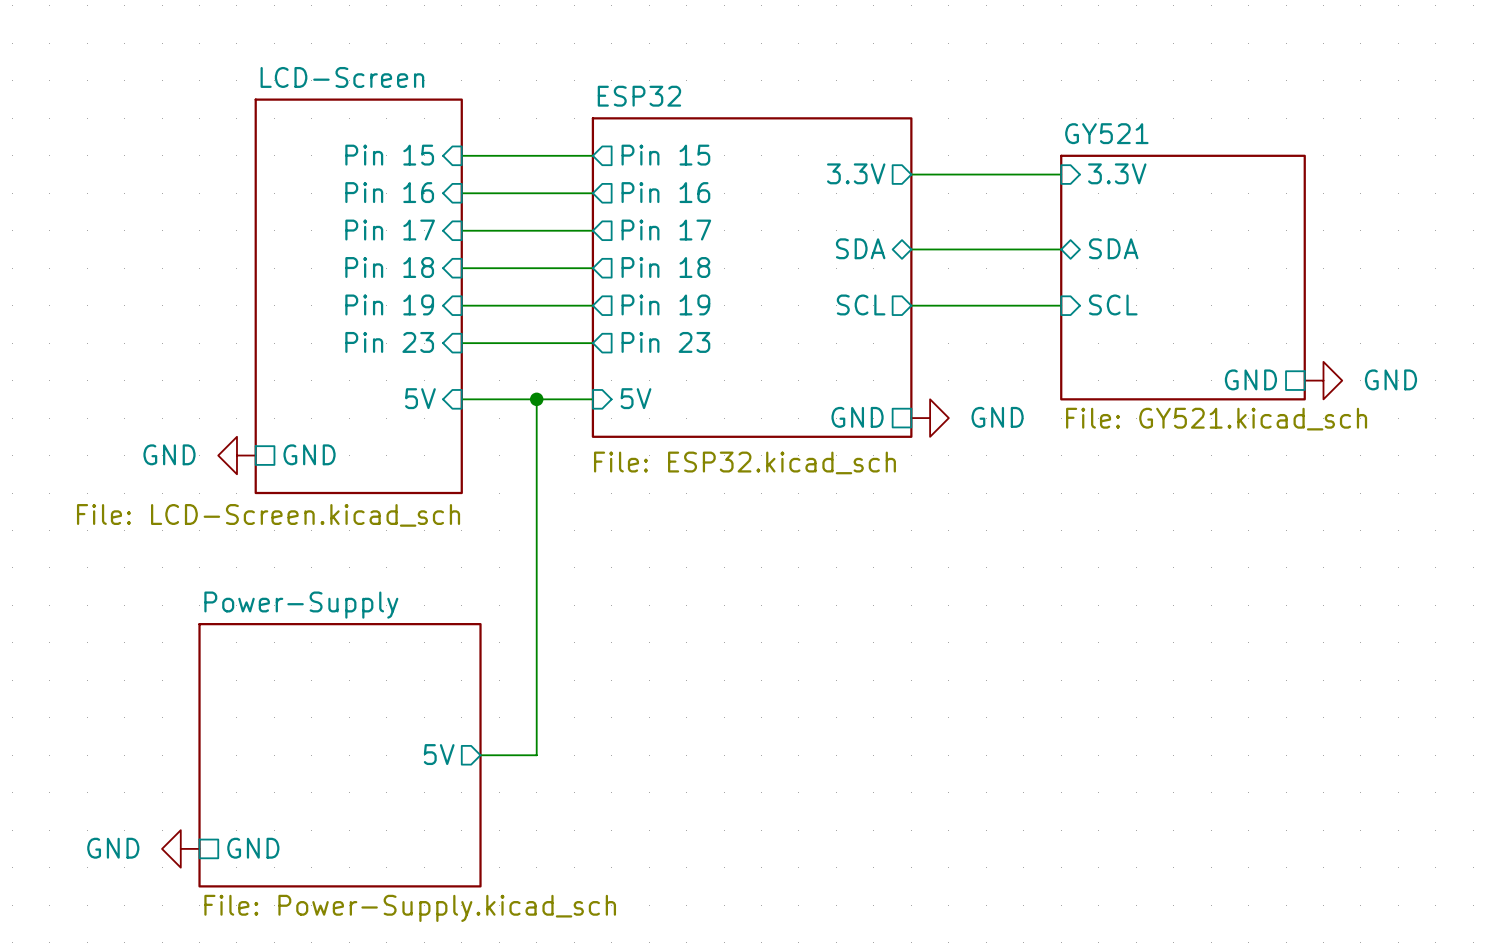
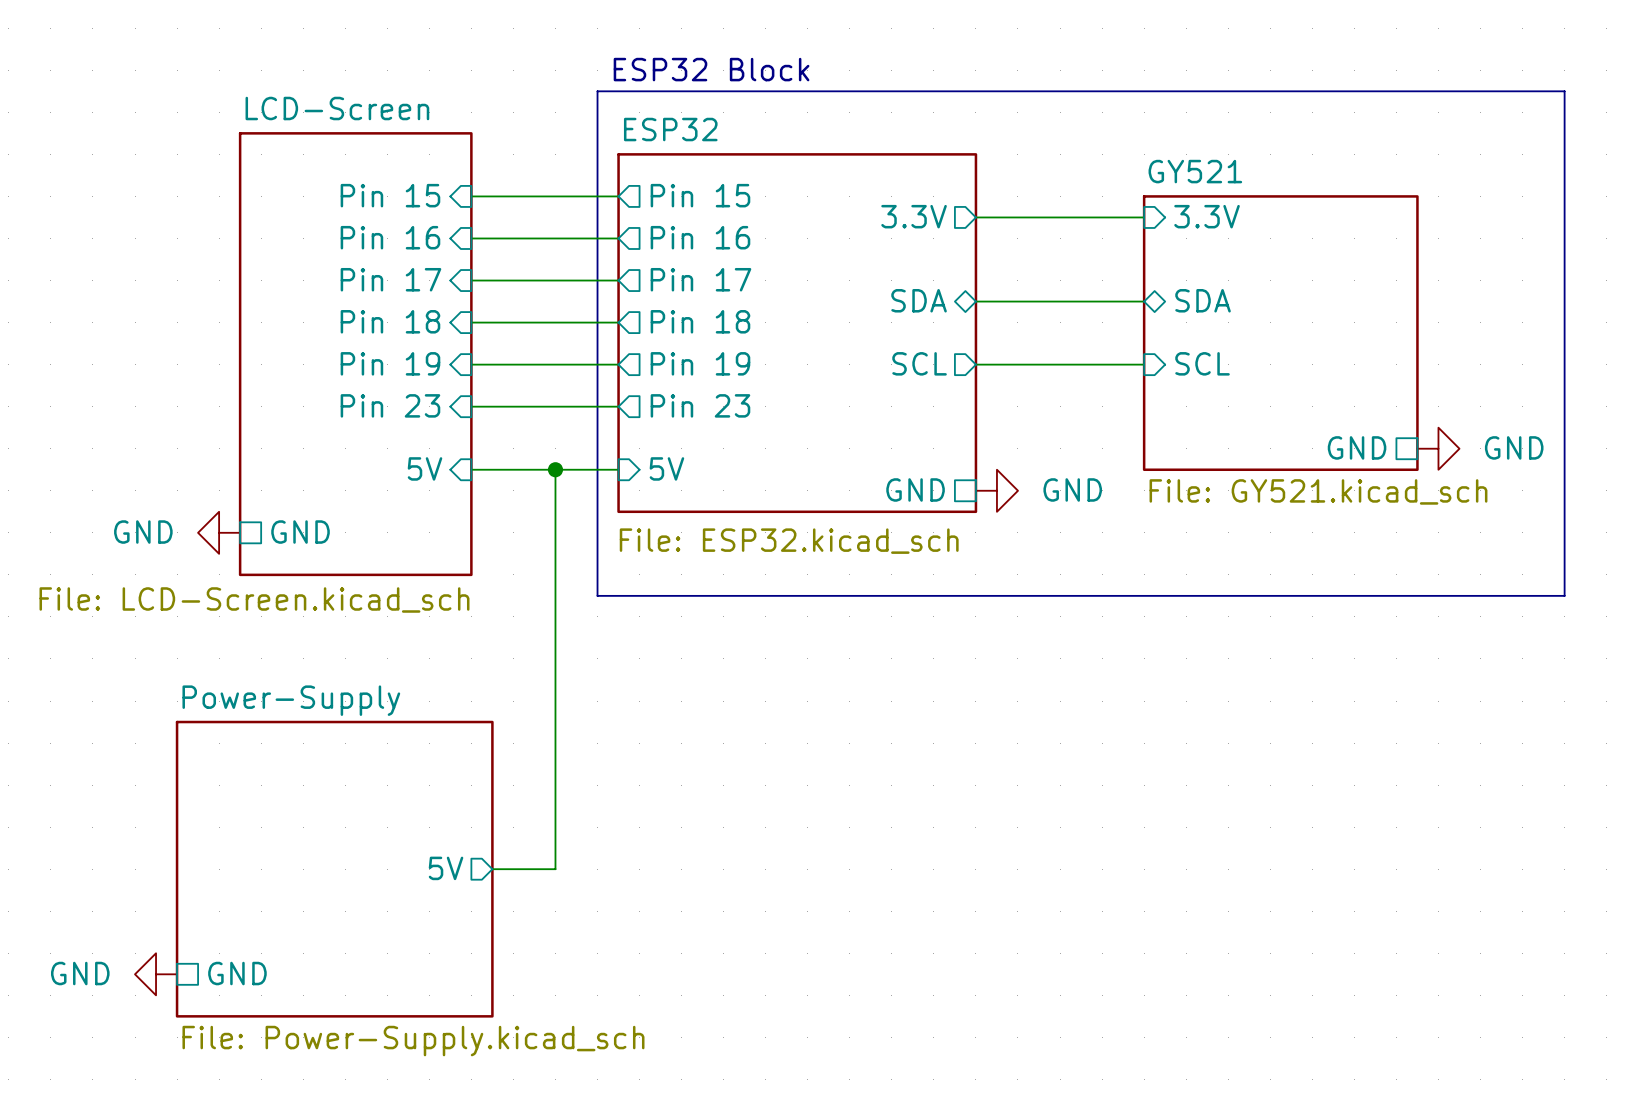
text: none -> ESP32 Block (711, 69)
line: none -> (597, 91) (1564, 91) (1564, 595) (597, 595) (597, 91)

